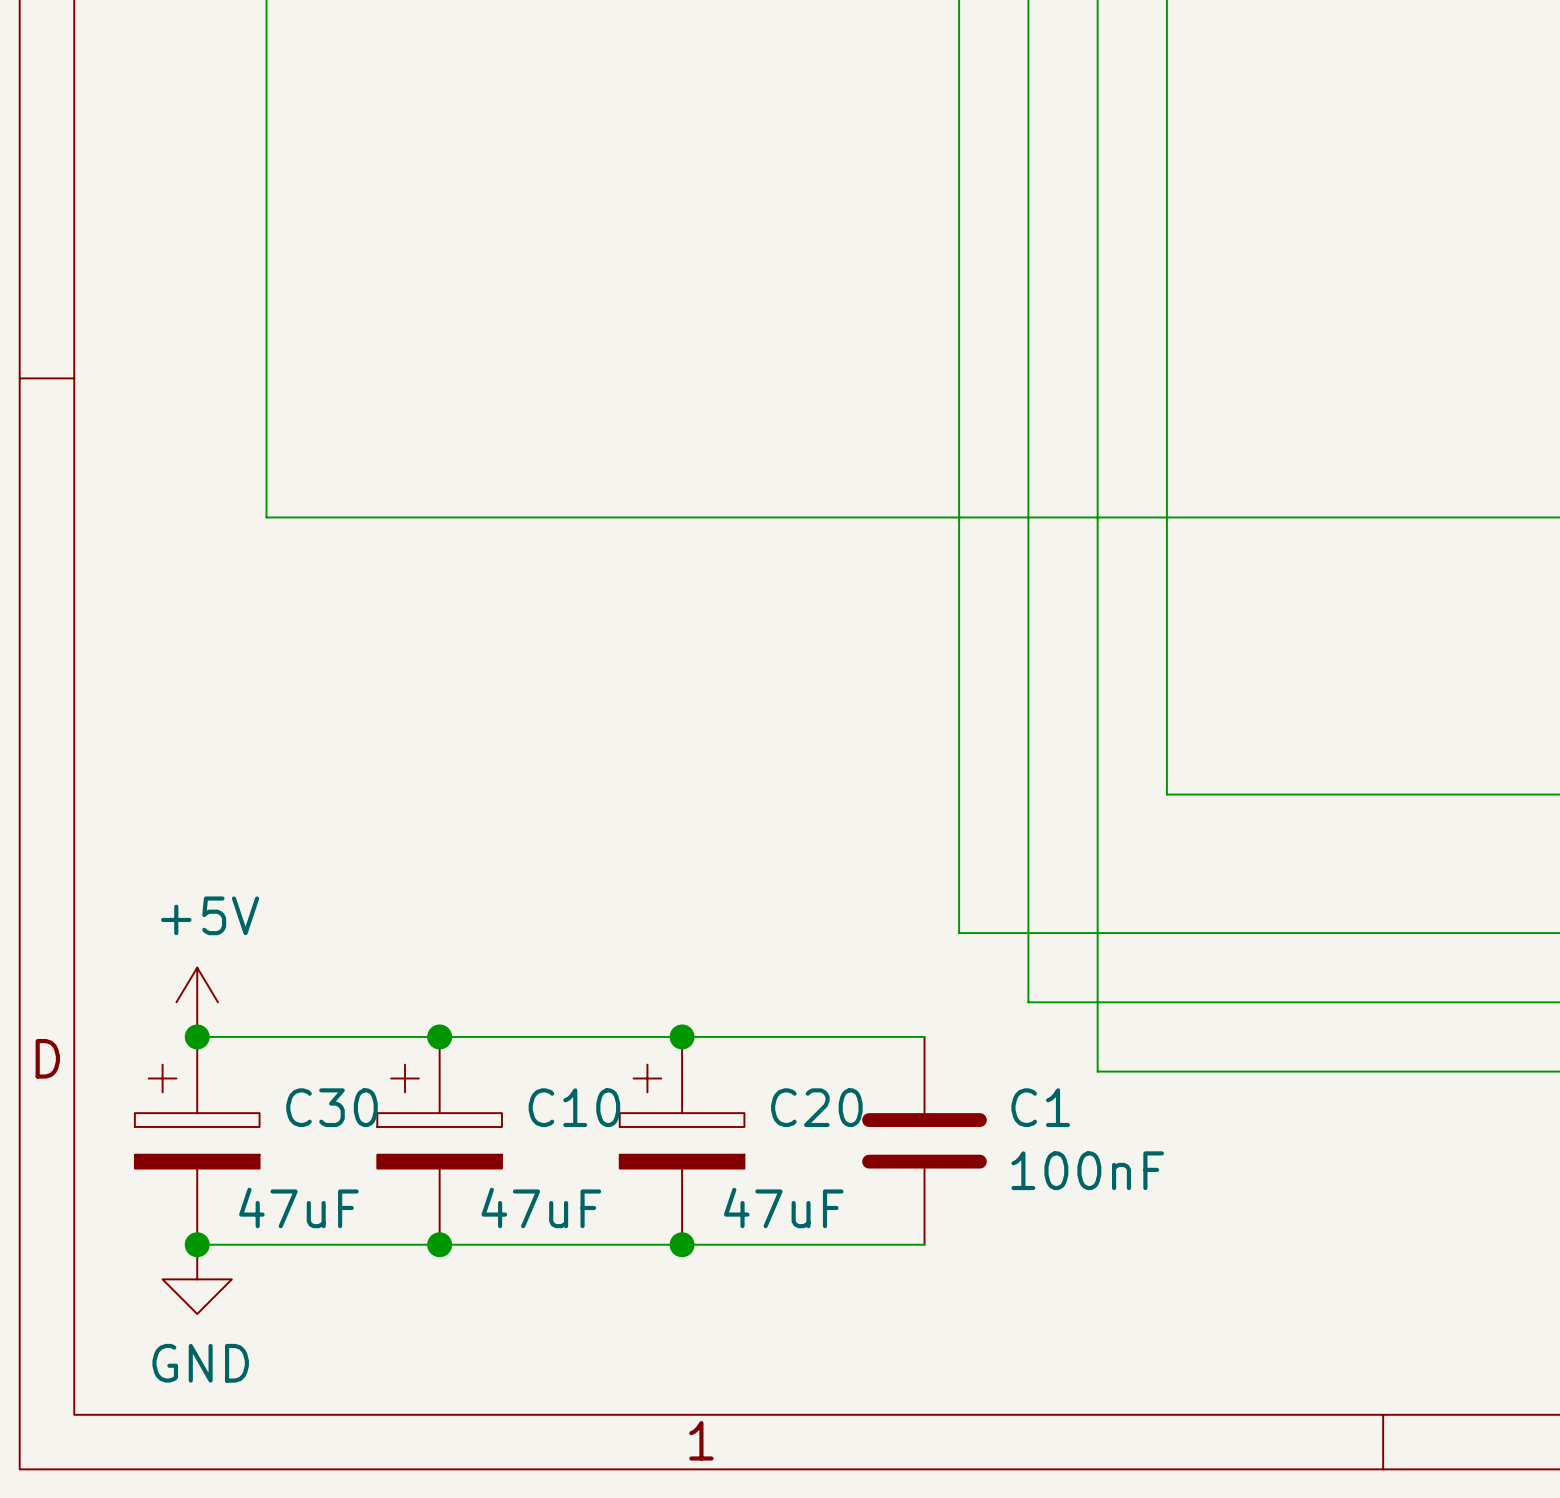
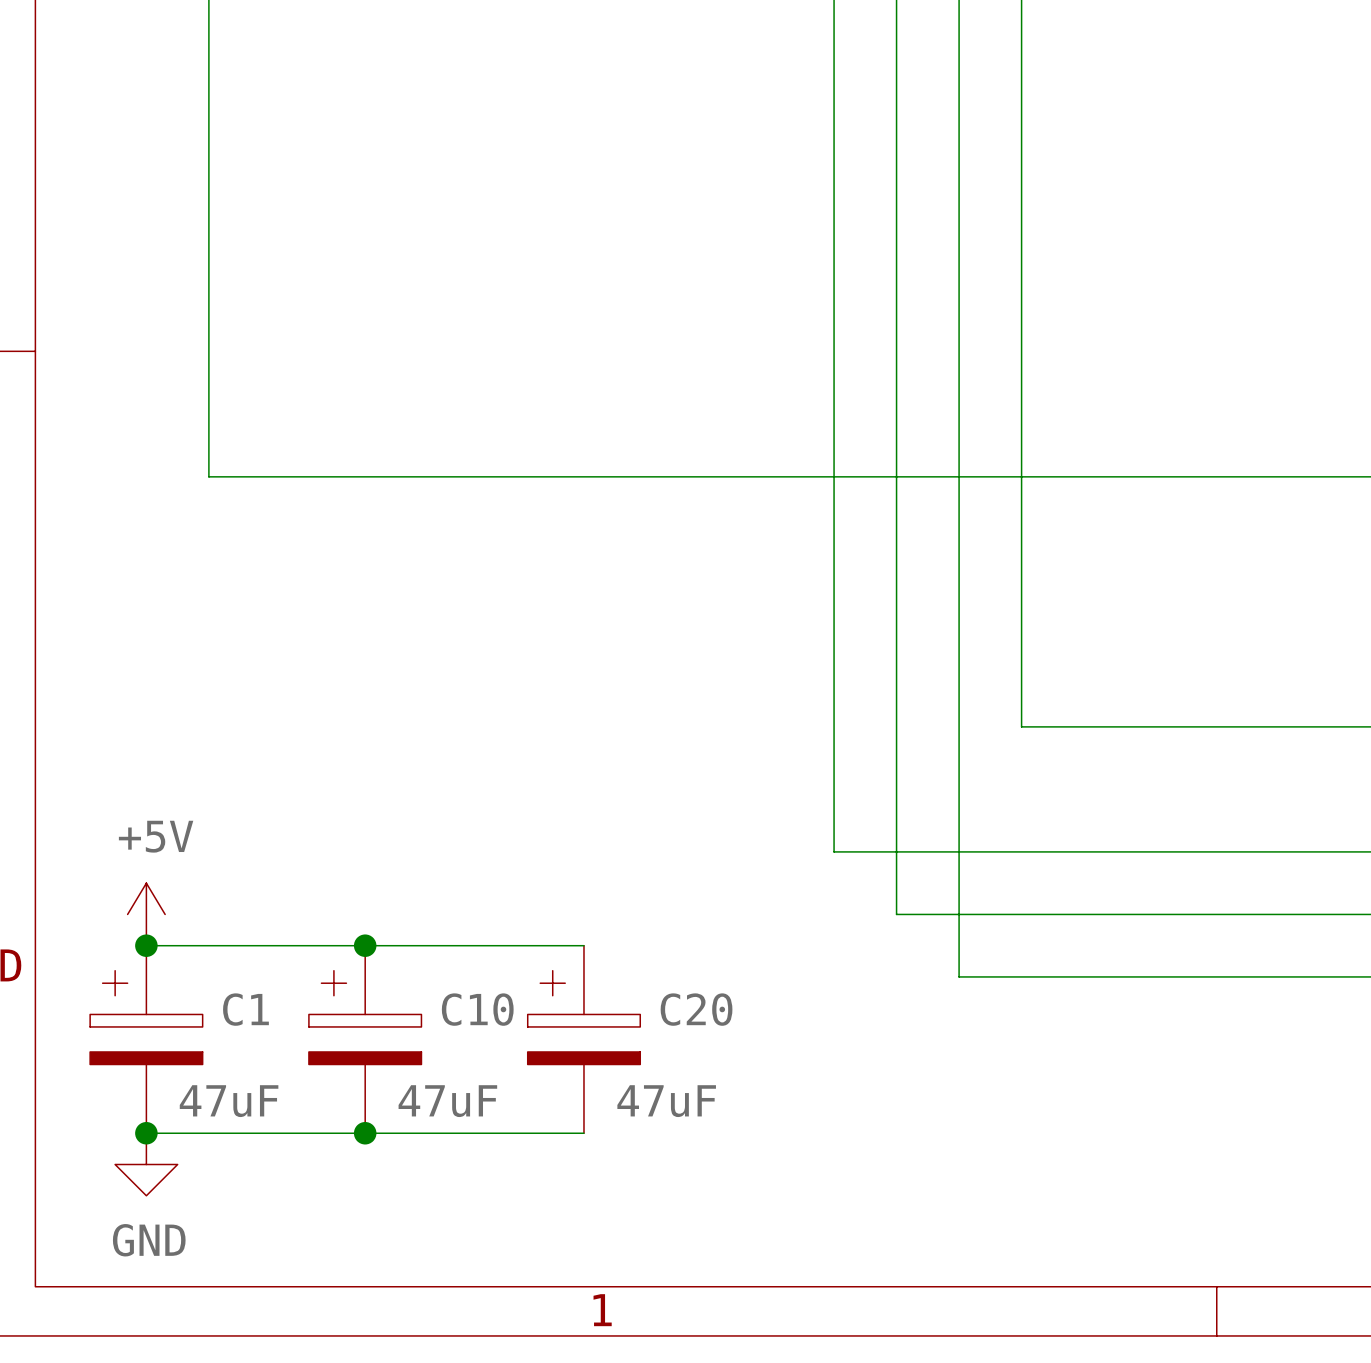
wire: (682, 1036) (924, 1036) -> none
junction: (682, 1036) -> none
C30 name: C30 (331, 1107) -> C1 (245, 1009)
C1: 100nF (924, 1140) -> none
wire: (682, 1244) (924, 1244) -> none
junction: (682, 1244) -> none

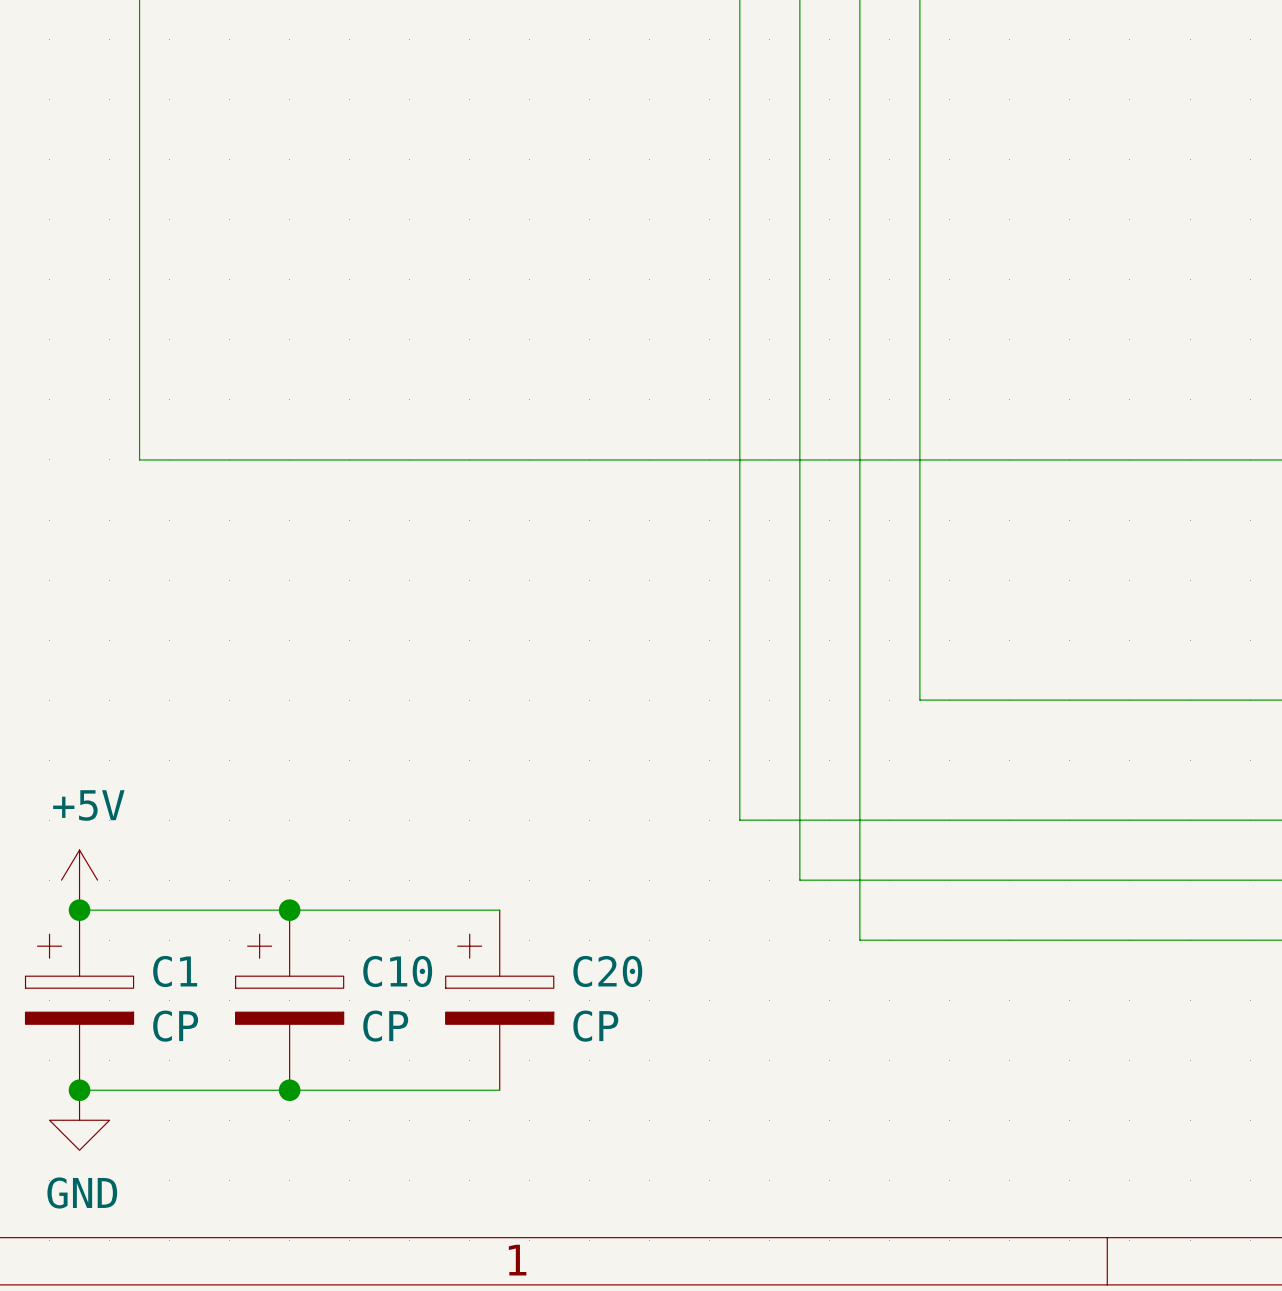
C1 value: 47uF (229, 1101) -> CP (175, 1026)
C10 value: 47uF (447, 1101) -> CP (385, 1026)
C20 value: 47uF (666, 1101) -> CP (595, 1026)

